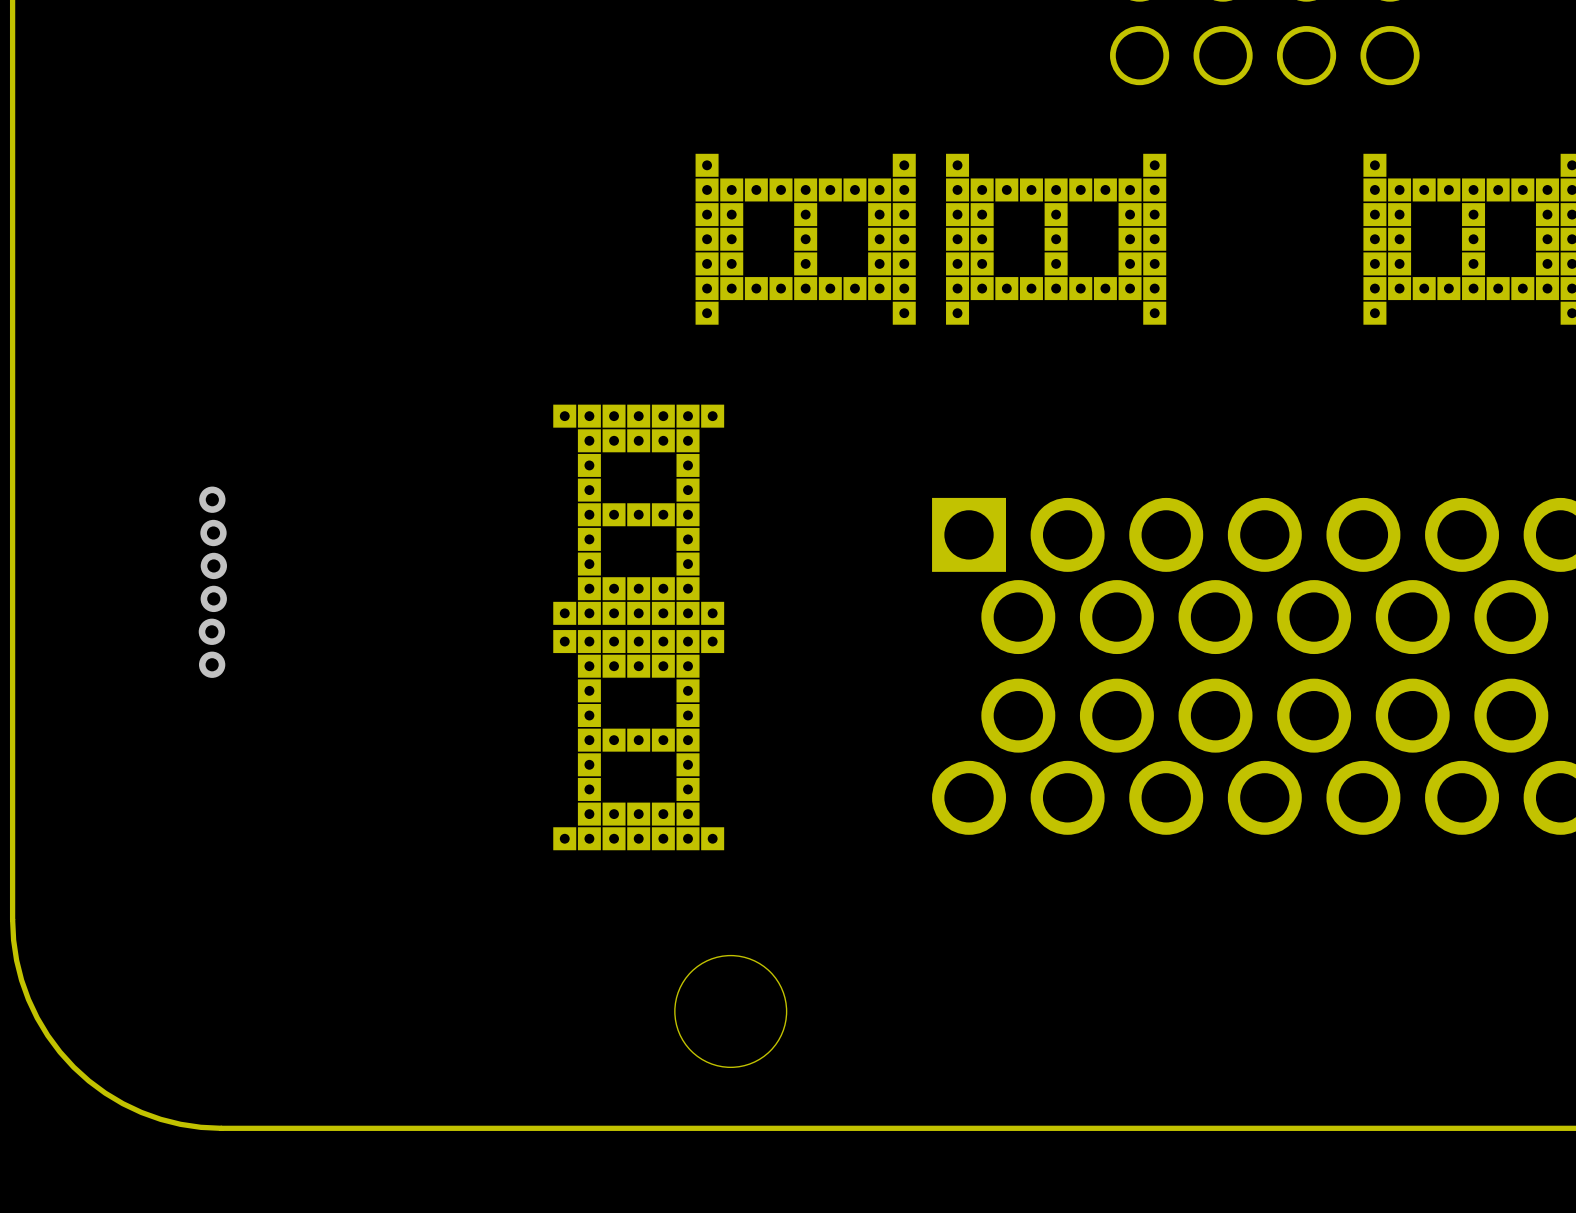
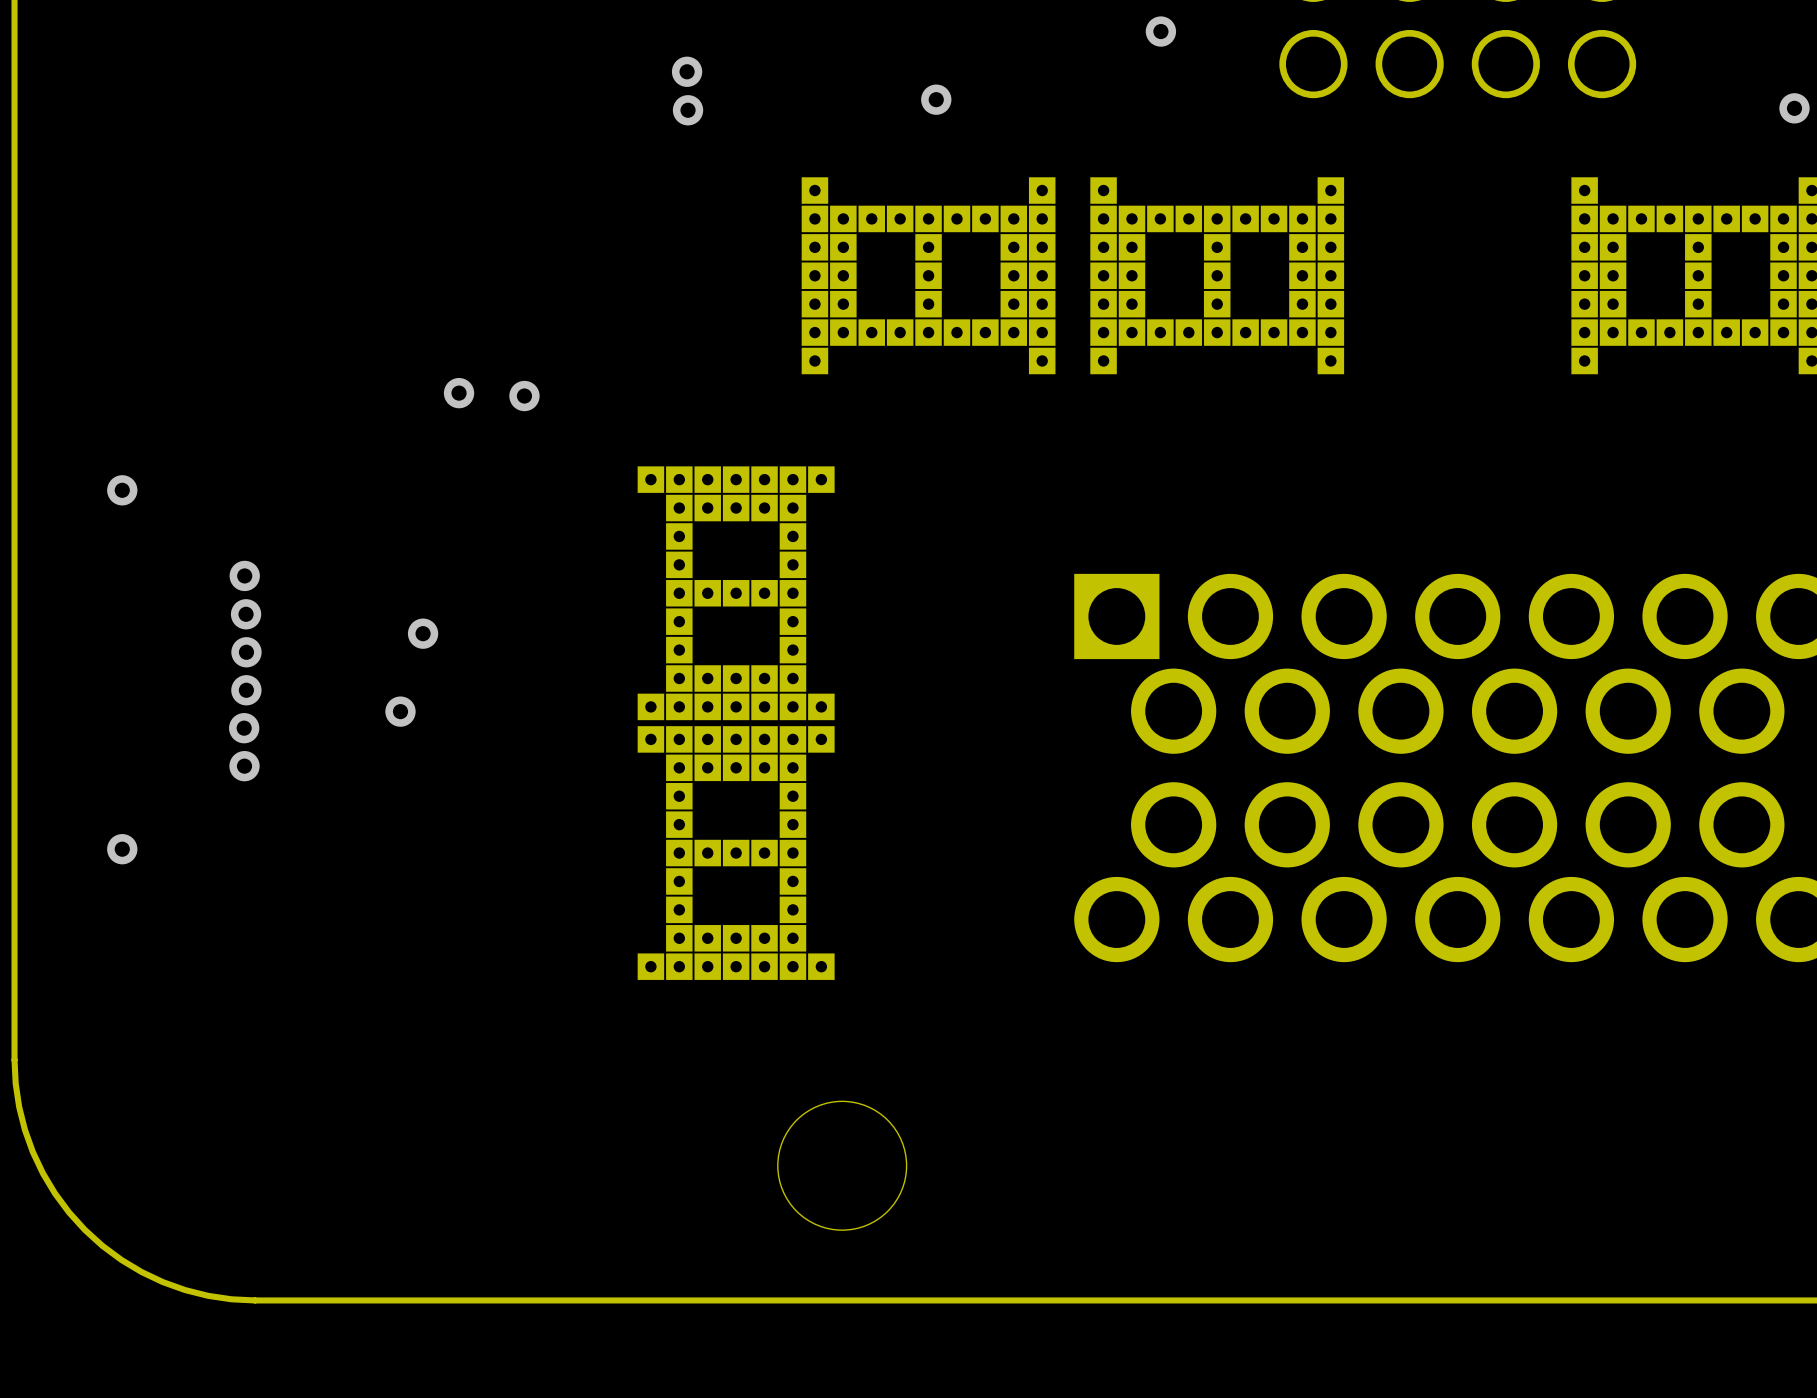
via: none -> (1160, 31)
via: none -> (687, 71)
via: none -> (936, 99)
via: none -> (1794, 108)
via: none -> (688, 110)
via: none -> (459, 393)
via: none -> (524, 396)
via: none -> (122, 490)
via: none -> (423, 633)
via: none -> (400, 711)
via: none -> (122, 849)

